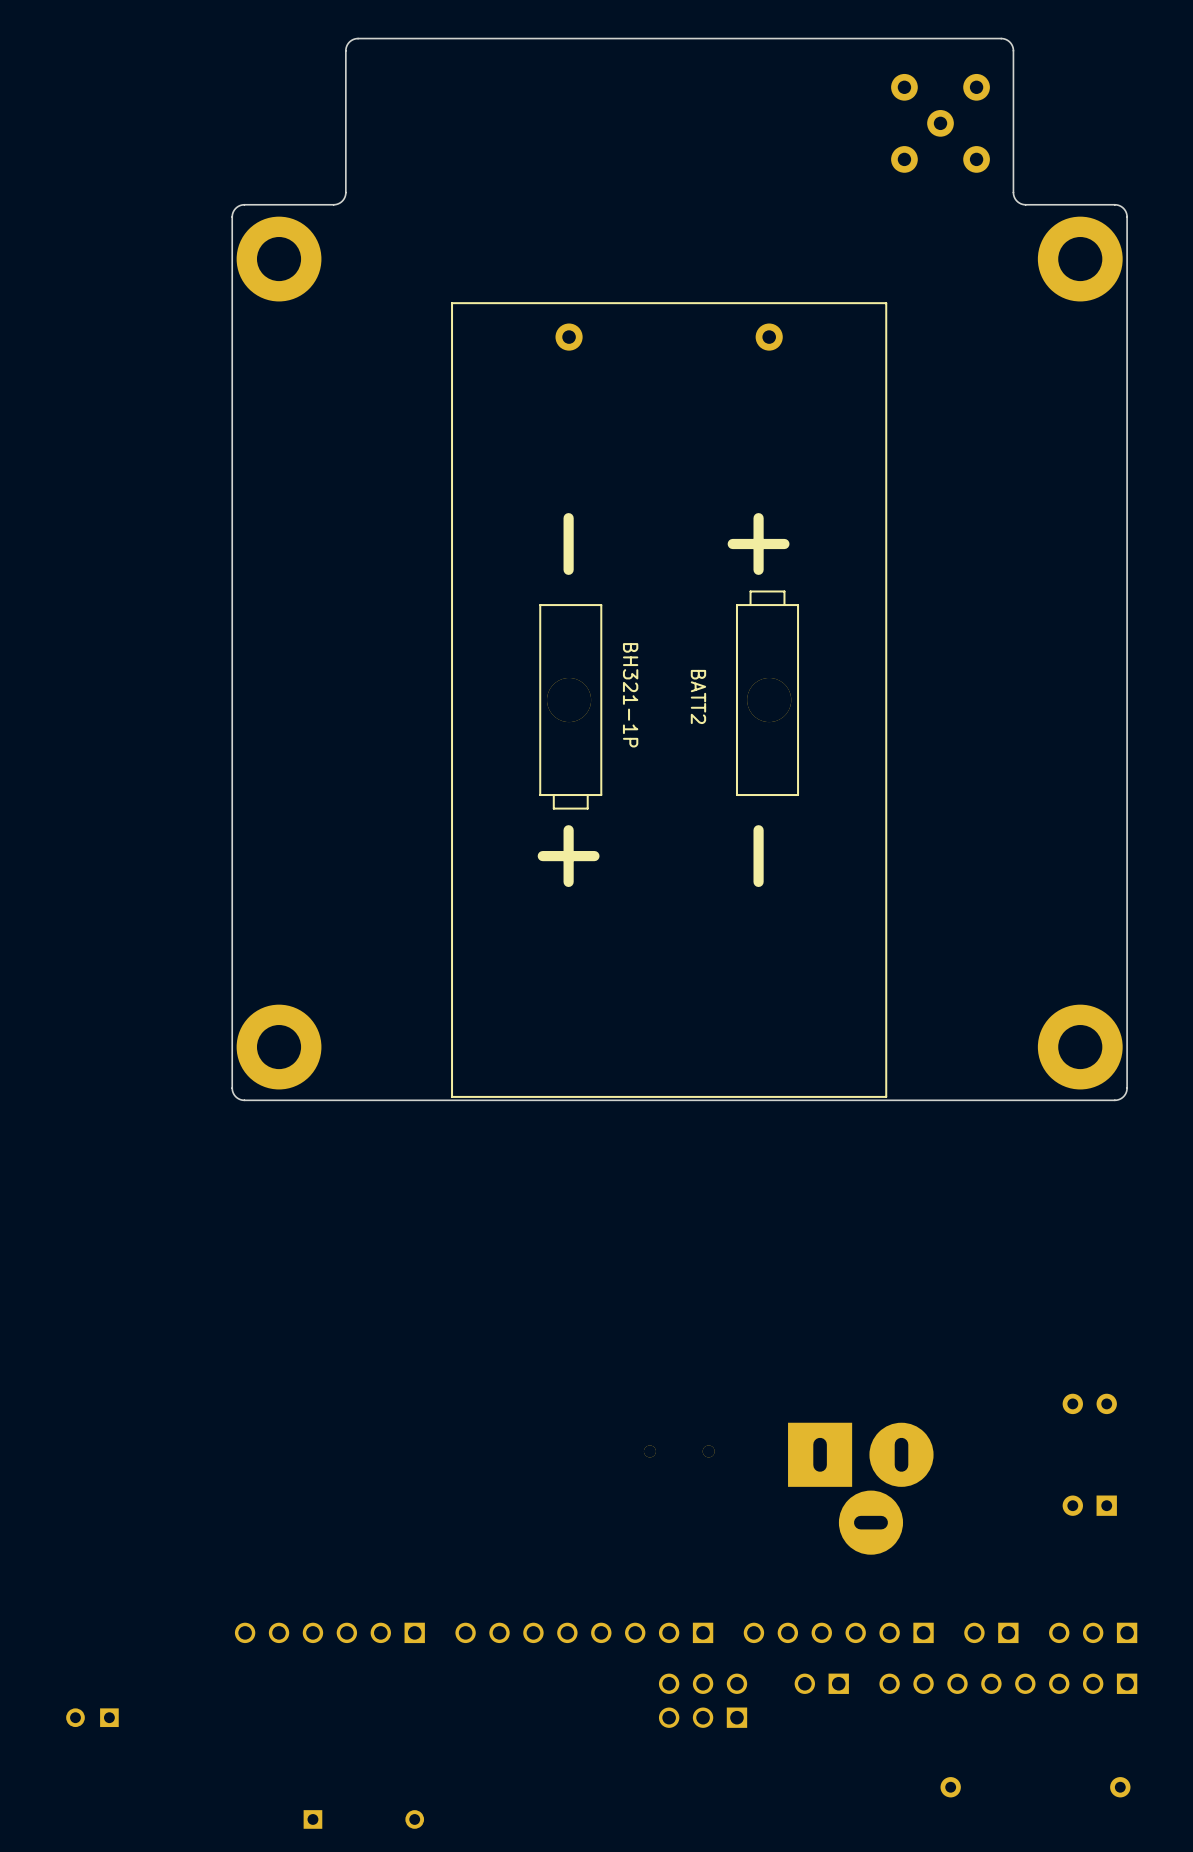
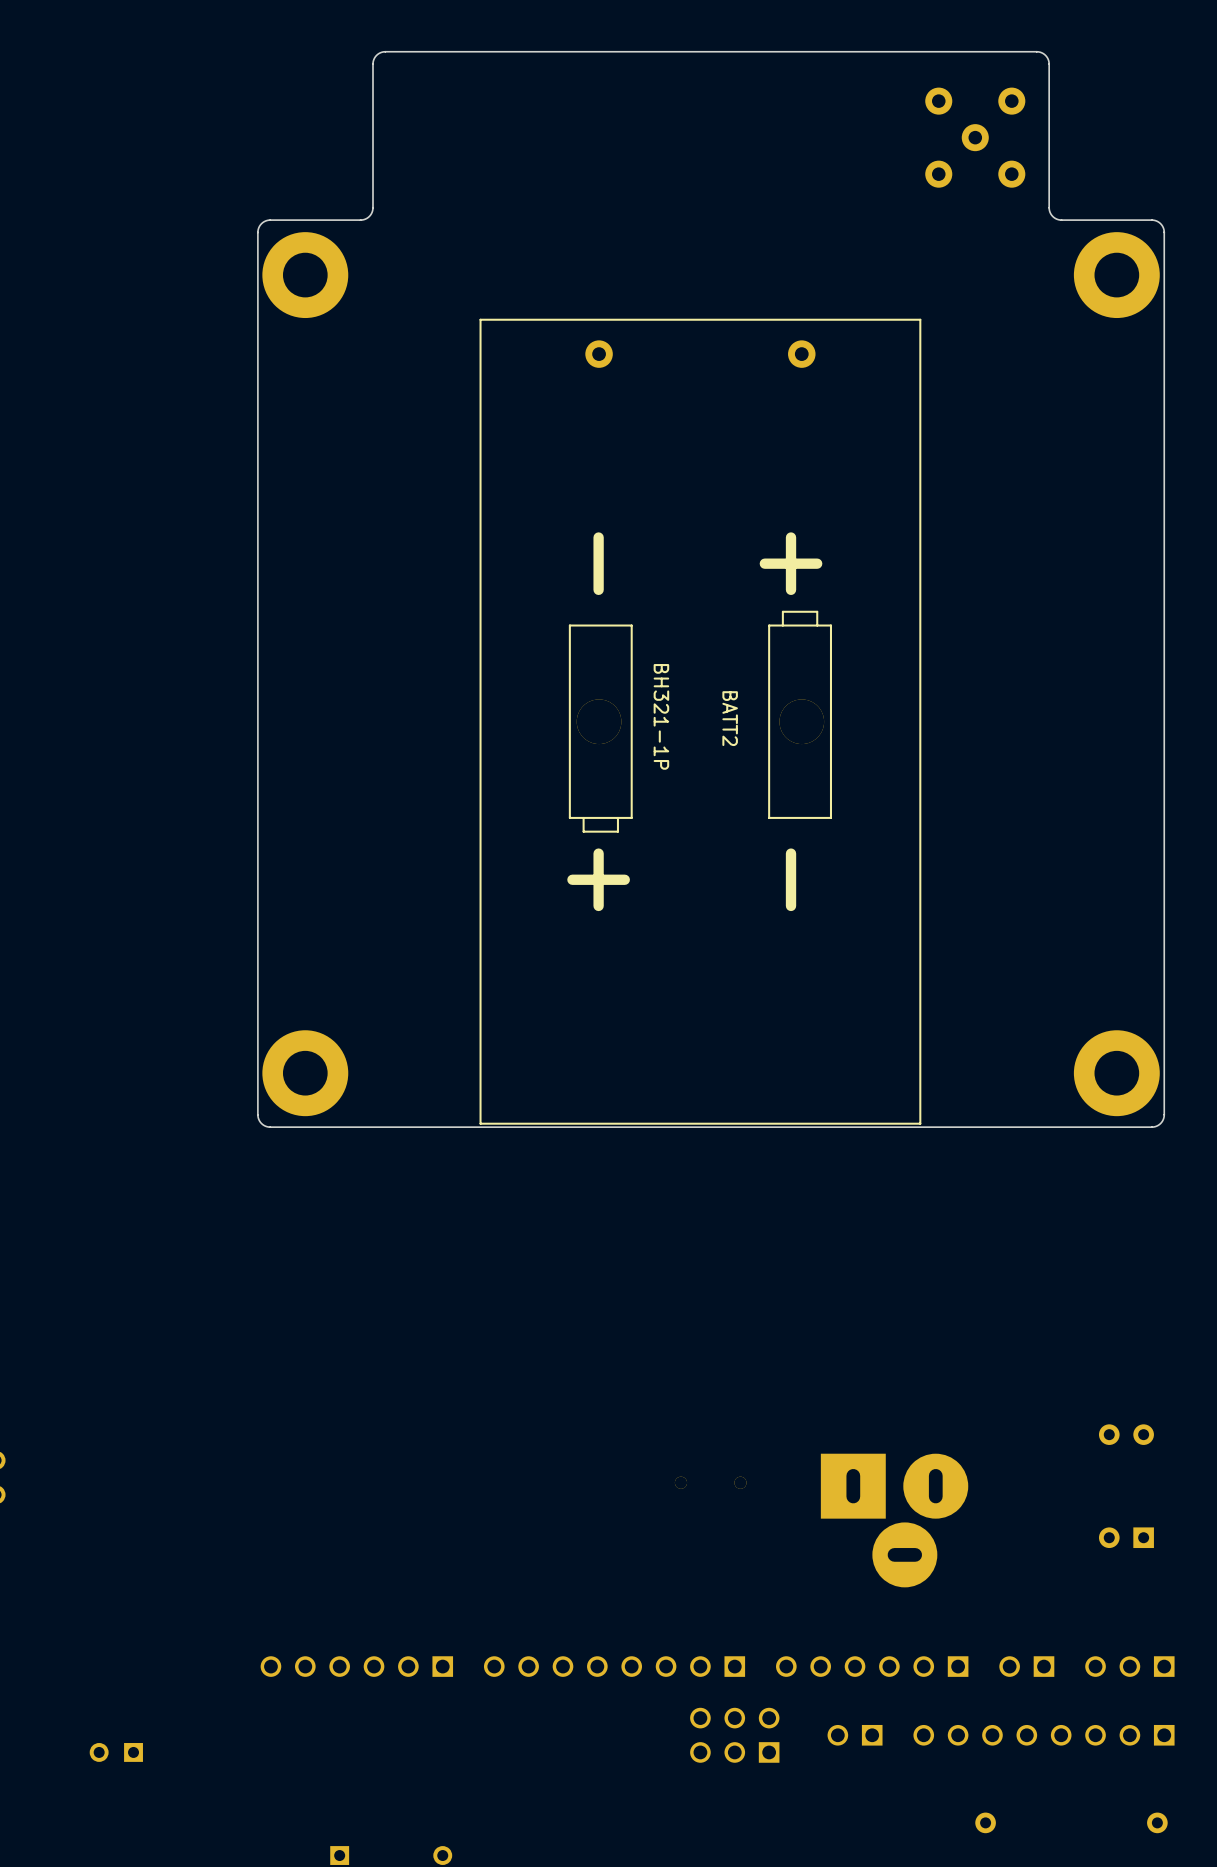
part position: (821, 1683) -> (855, 1735)
part position: (1008, 1683) -> (1044, 1735)

